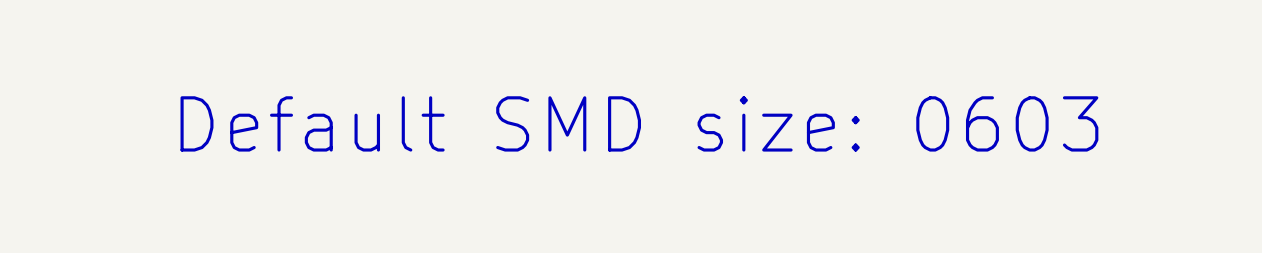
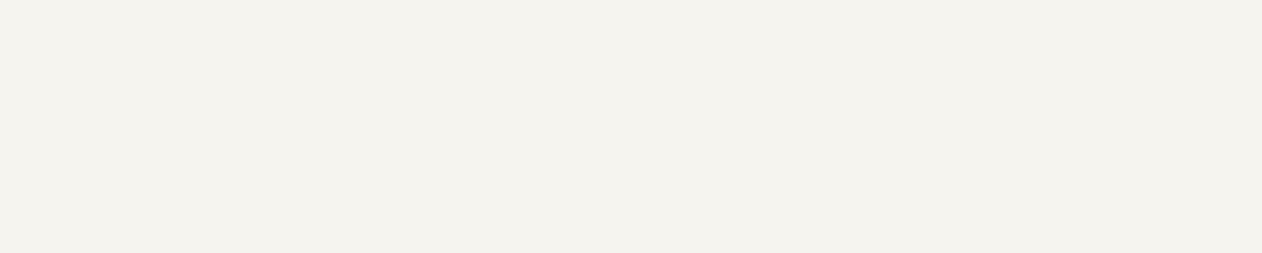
text: Default SMD size: 0603 (639, 123) -> none

